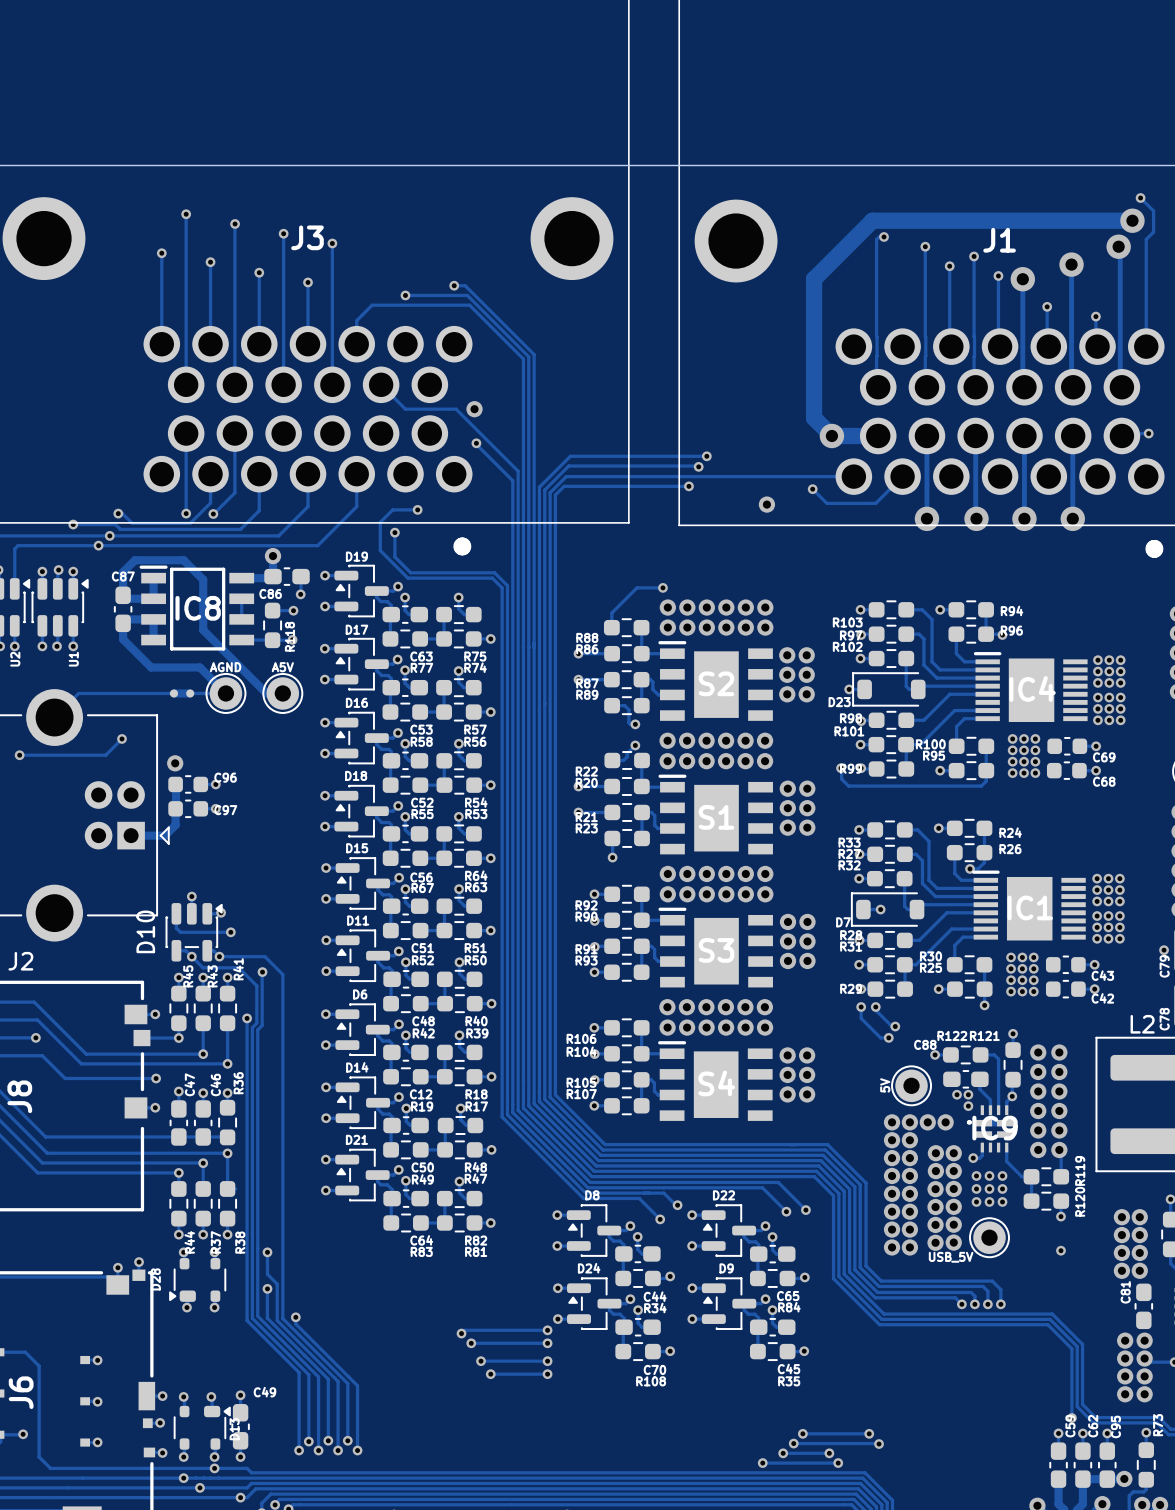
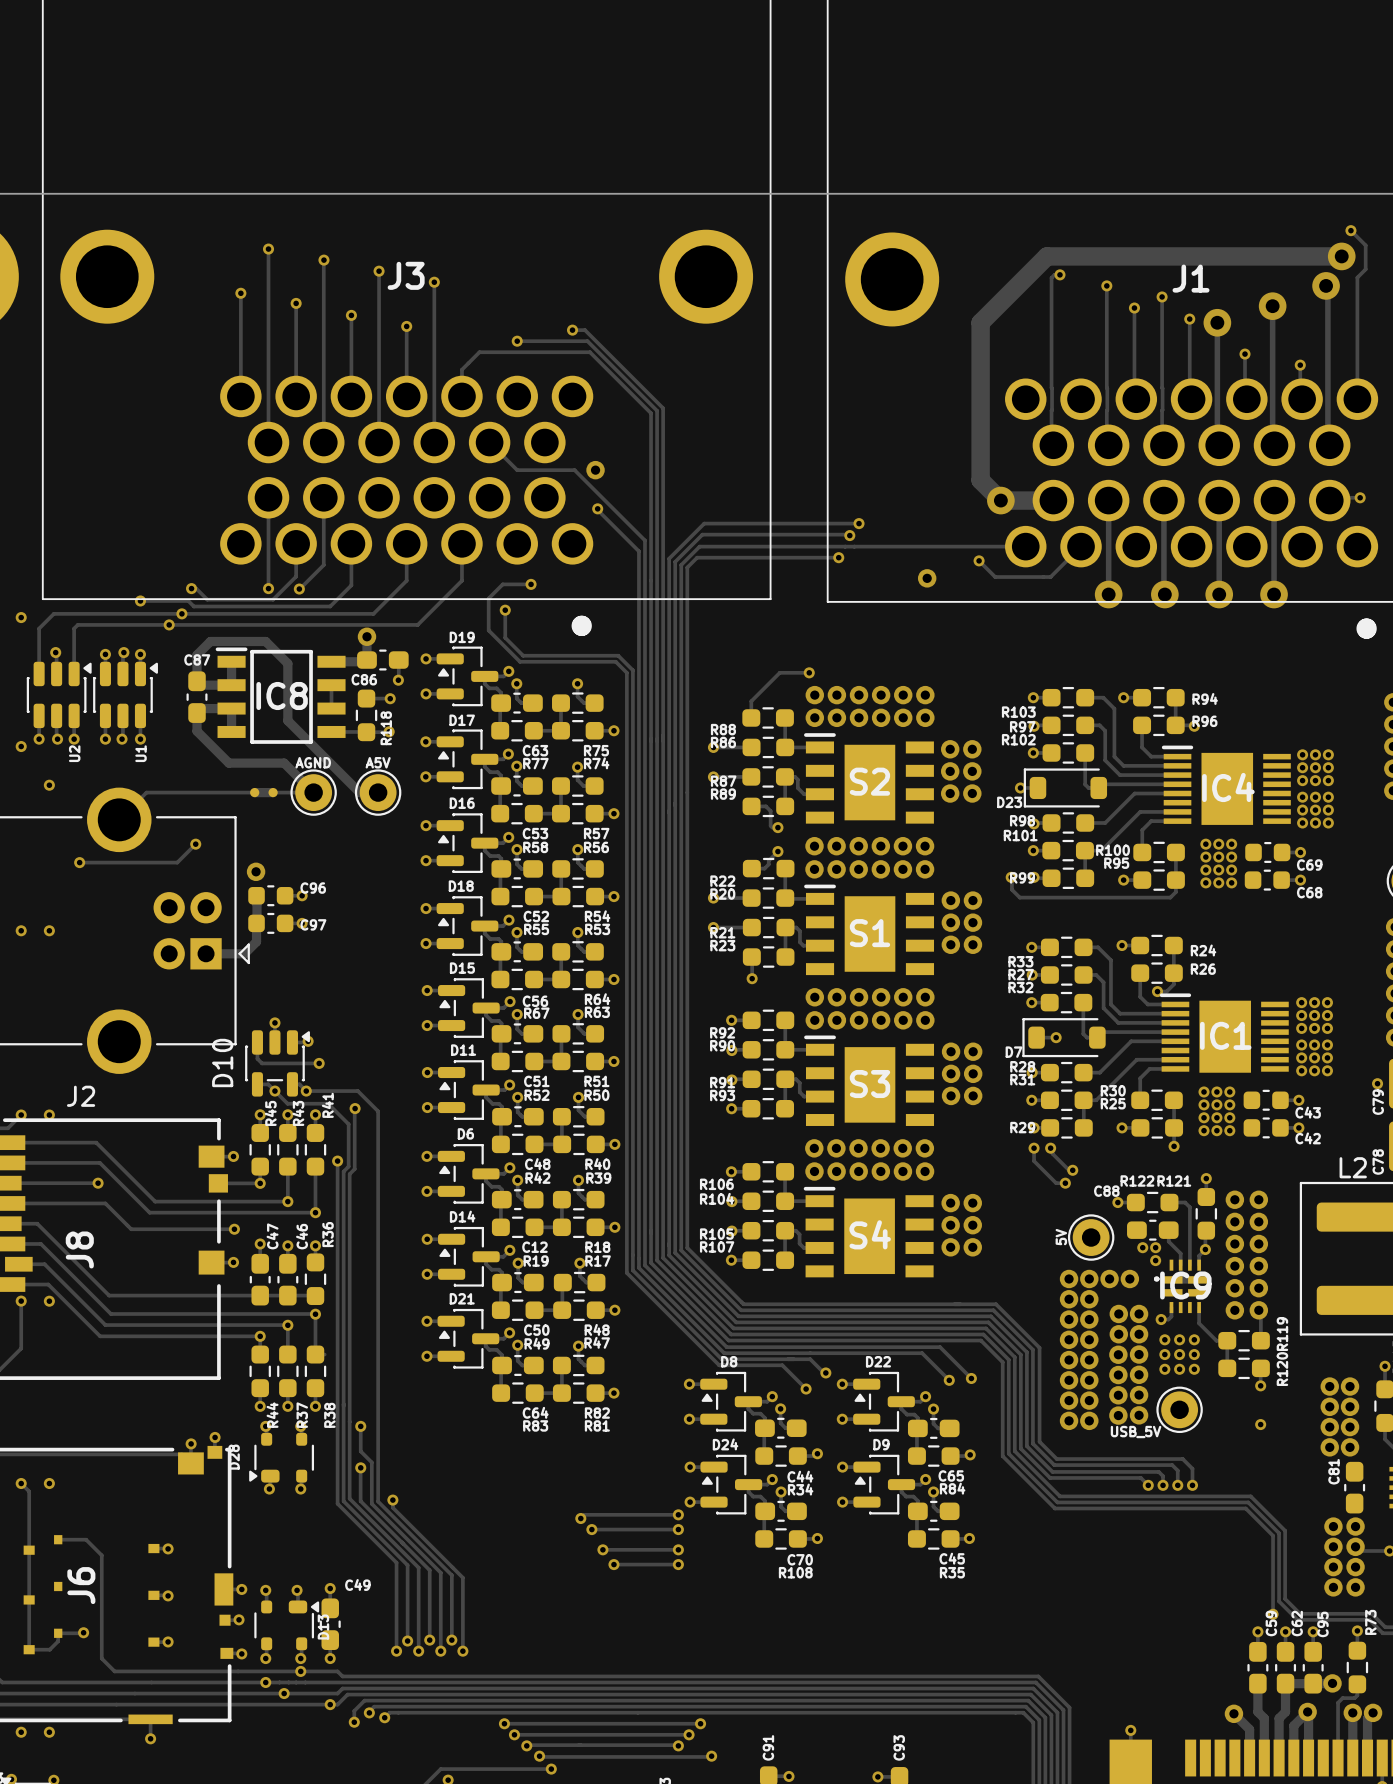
track: (802, 1433) (869, 1433) -> none
via: (802, 1433) -> none
via: (869, 1433) -> none
track: (793, 1443) (879, 1444) -> none
via: (793, 1443) -> none
via: (879, 1444) -> none
track: (783, 1453) (829, 1453) -> none
via: (783, 1453) -> none
via: (829, 1453) -> none
track: (762, 1463) (838, 1463) -> none
via: (762, 1463) -> none
via: (838, 1463) -> none

